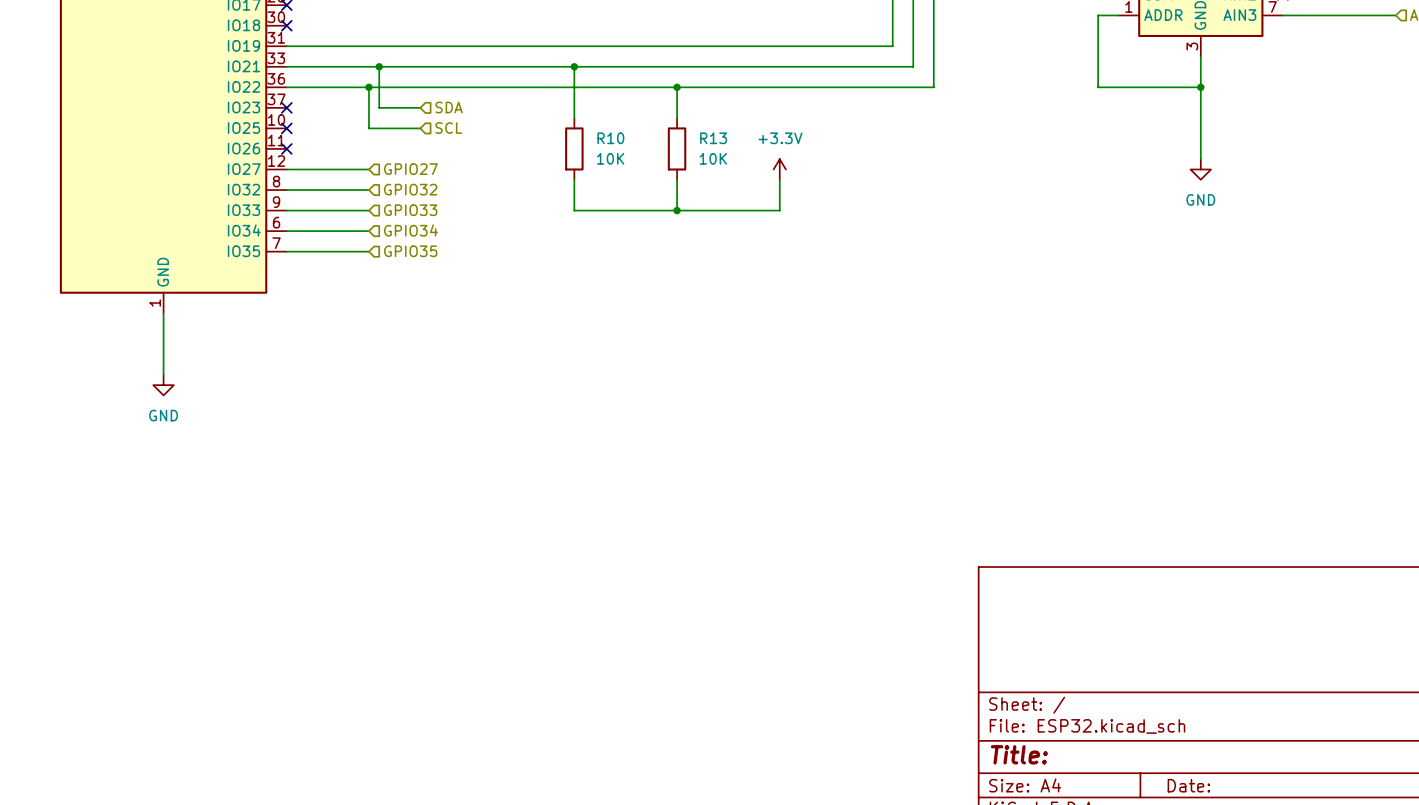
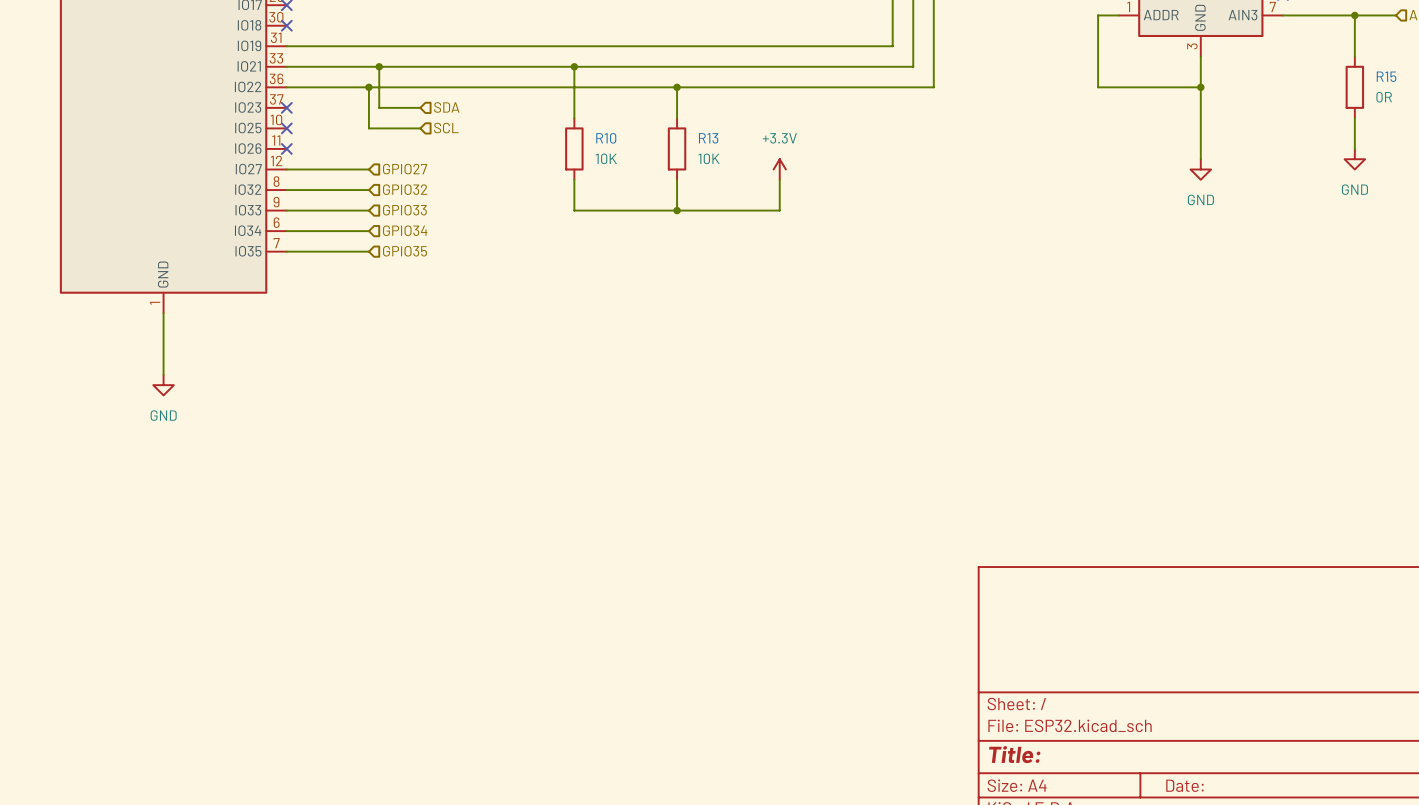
wire: none -> (1354, 15) (1354, 56)
junction: none -> (1354, 15)
R15: none -> 0R (1354, 87)
wire: none -> (1354, 118) (1354, 148)
power symbol: none -> GND (1354, 159)

